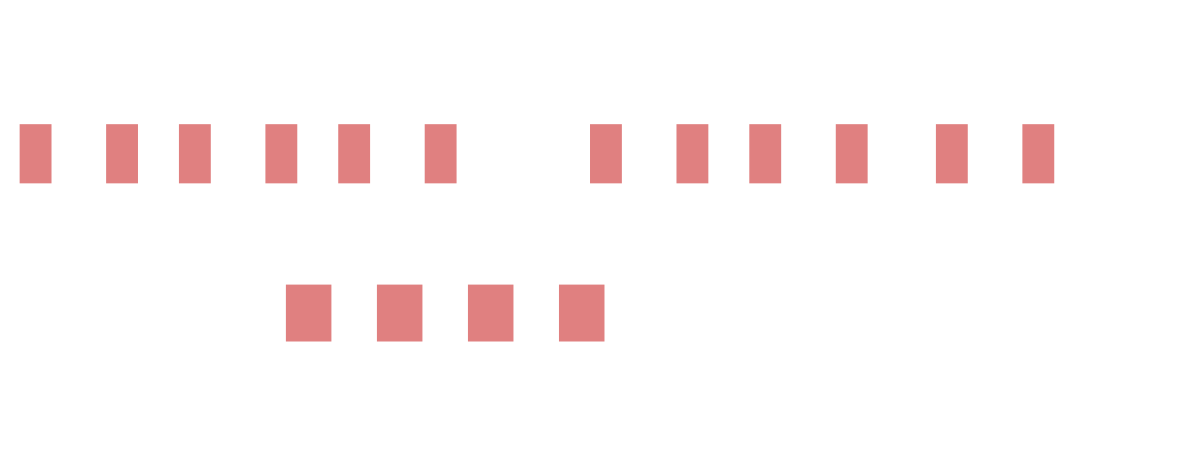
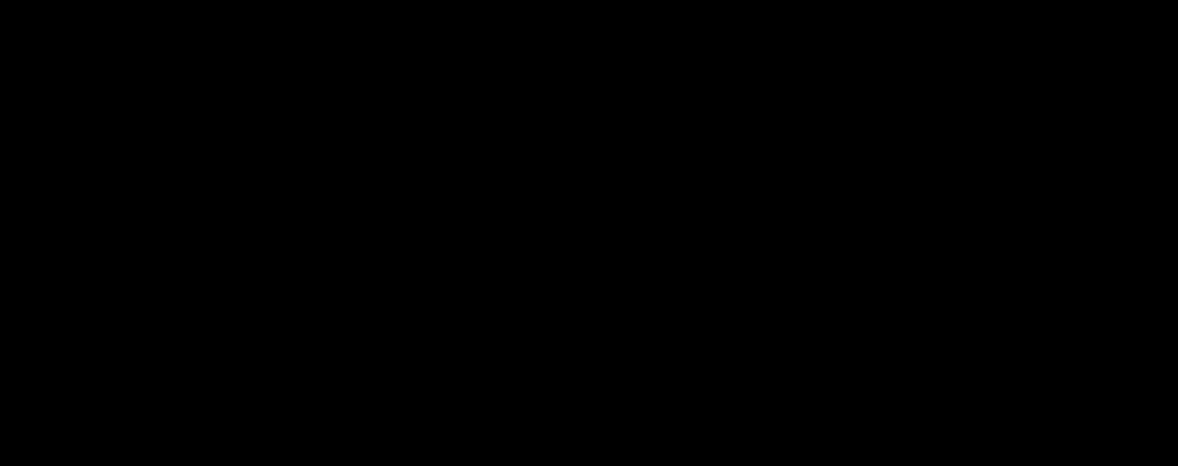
part: (78, 153) -> none
part: (238, 153) -> none
part: (397, 153) -> none
part: (649, 153) -> none
part: (808, 153) -> none
part: (995, 153) -> none
part: (354, 313) -> none
part: (536, 313) -> none

